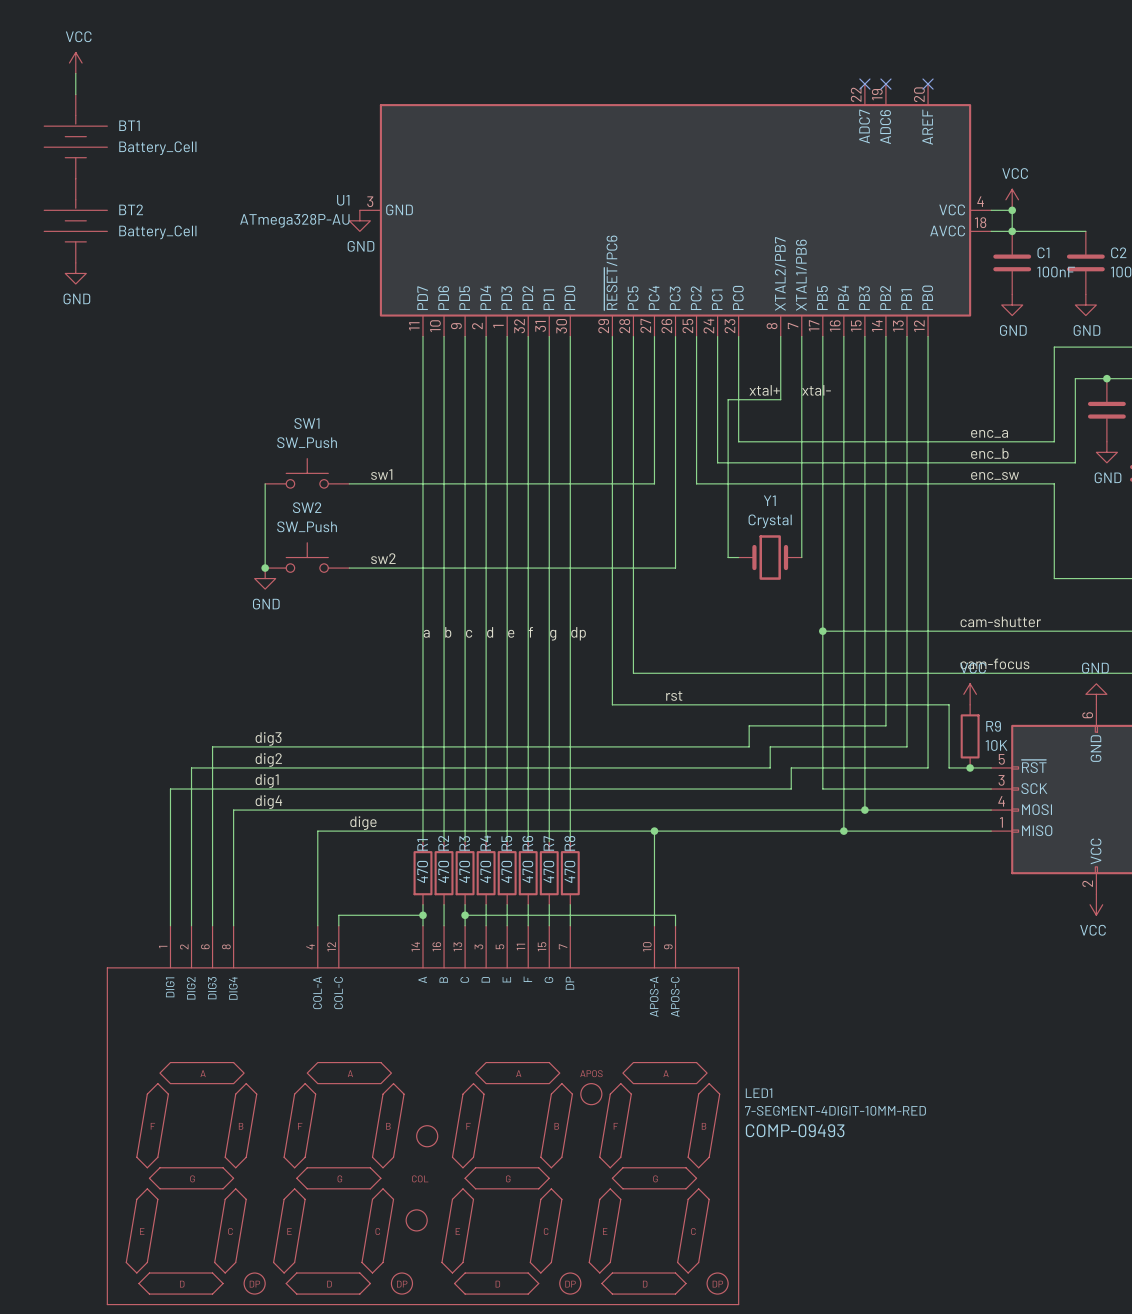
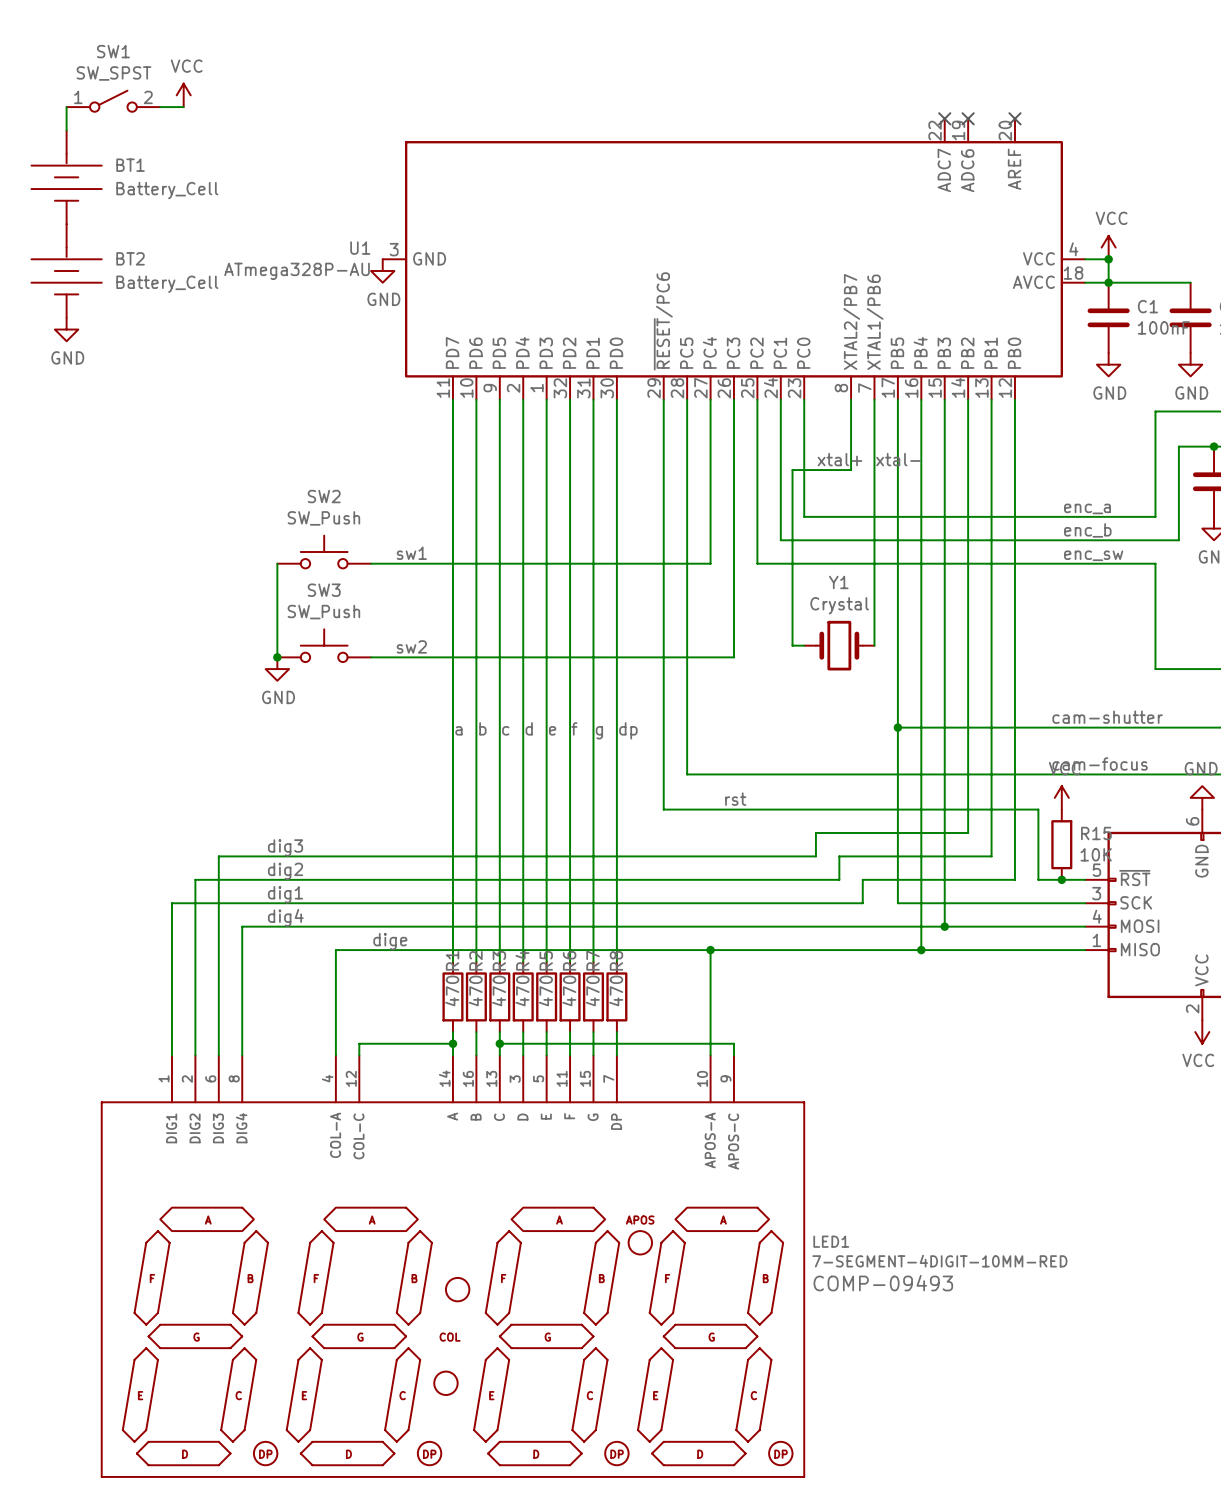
power symbol position: VCC (75, 63) -> VCC (183, 95)
SW1: none -> SW_SPST (113, 101)
wire: none -> (160, 107) (183, 107)
SW1 name: SW1 (306, 423) -> SW2 (324, 496)
SW2 name: SW2 (307, 507) -> SW3 (324, 590)
R9 name: R9 (993, 726) -> R15 (1096, 833)

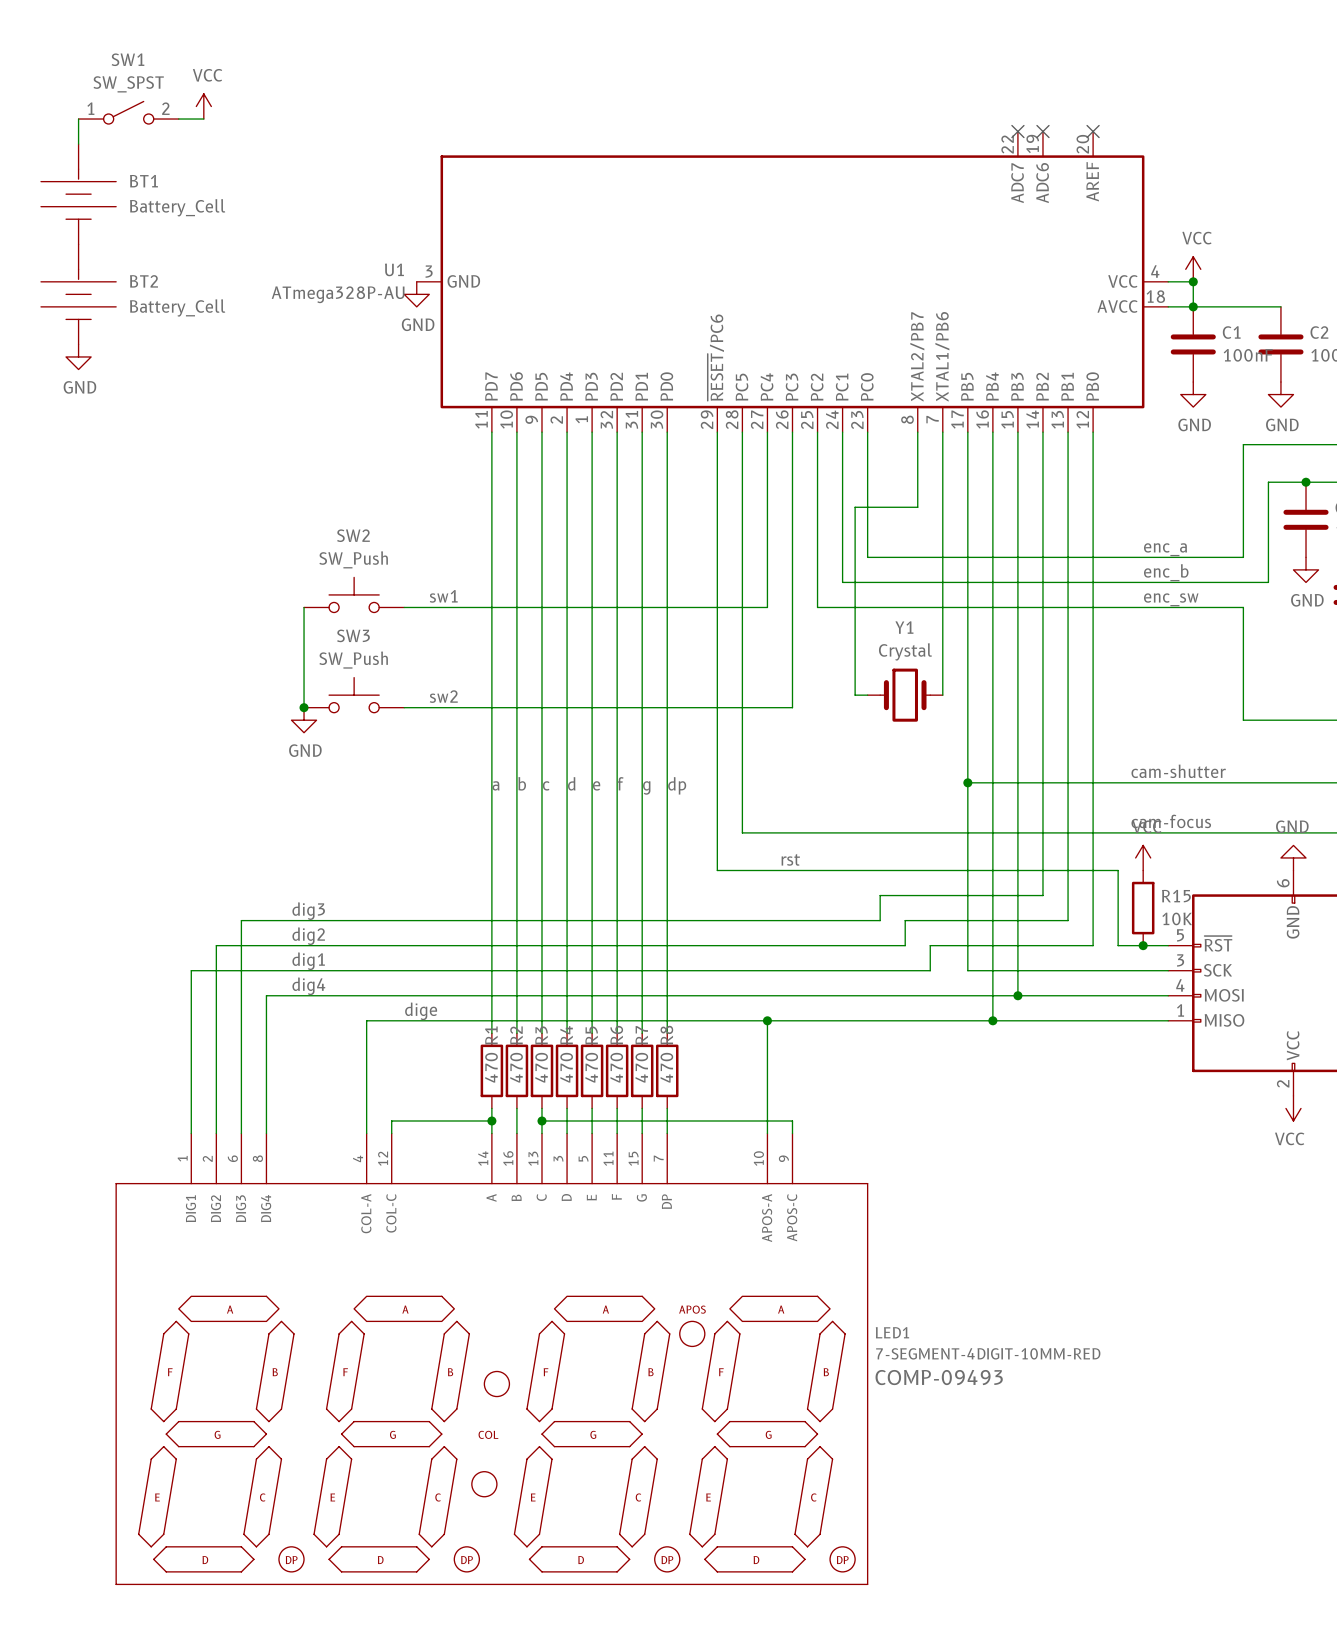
label: xtal+ (840, 459) -> none
label: xtal- (898, 459) -> none

